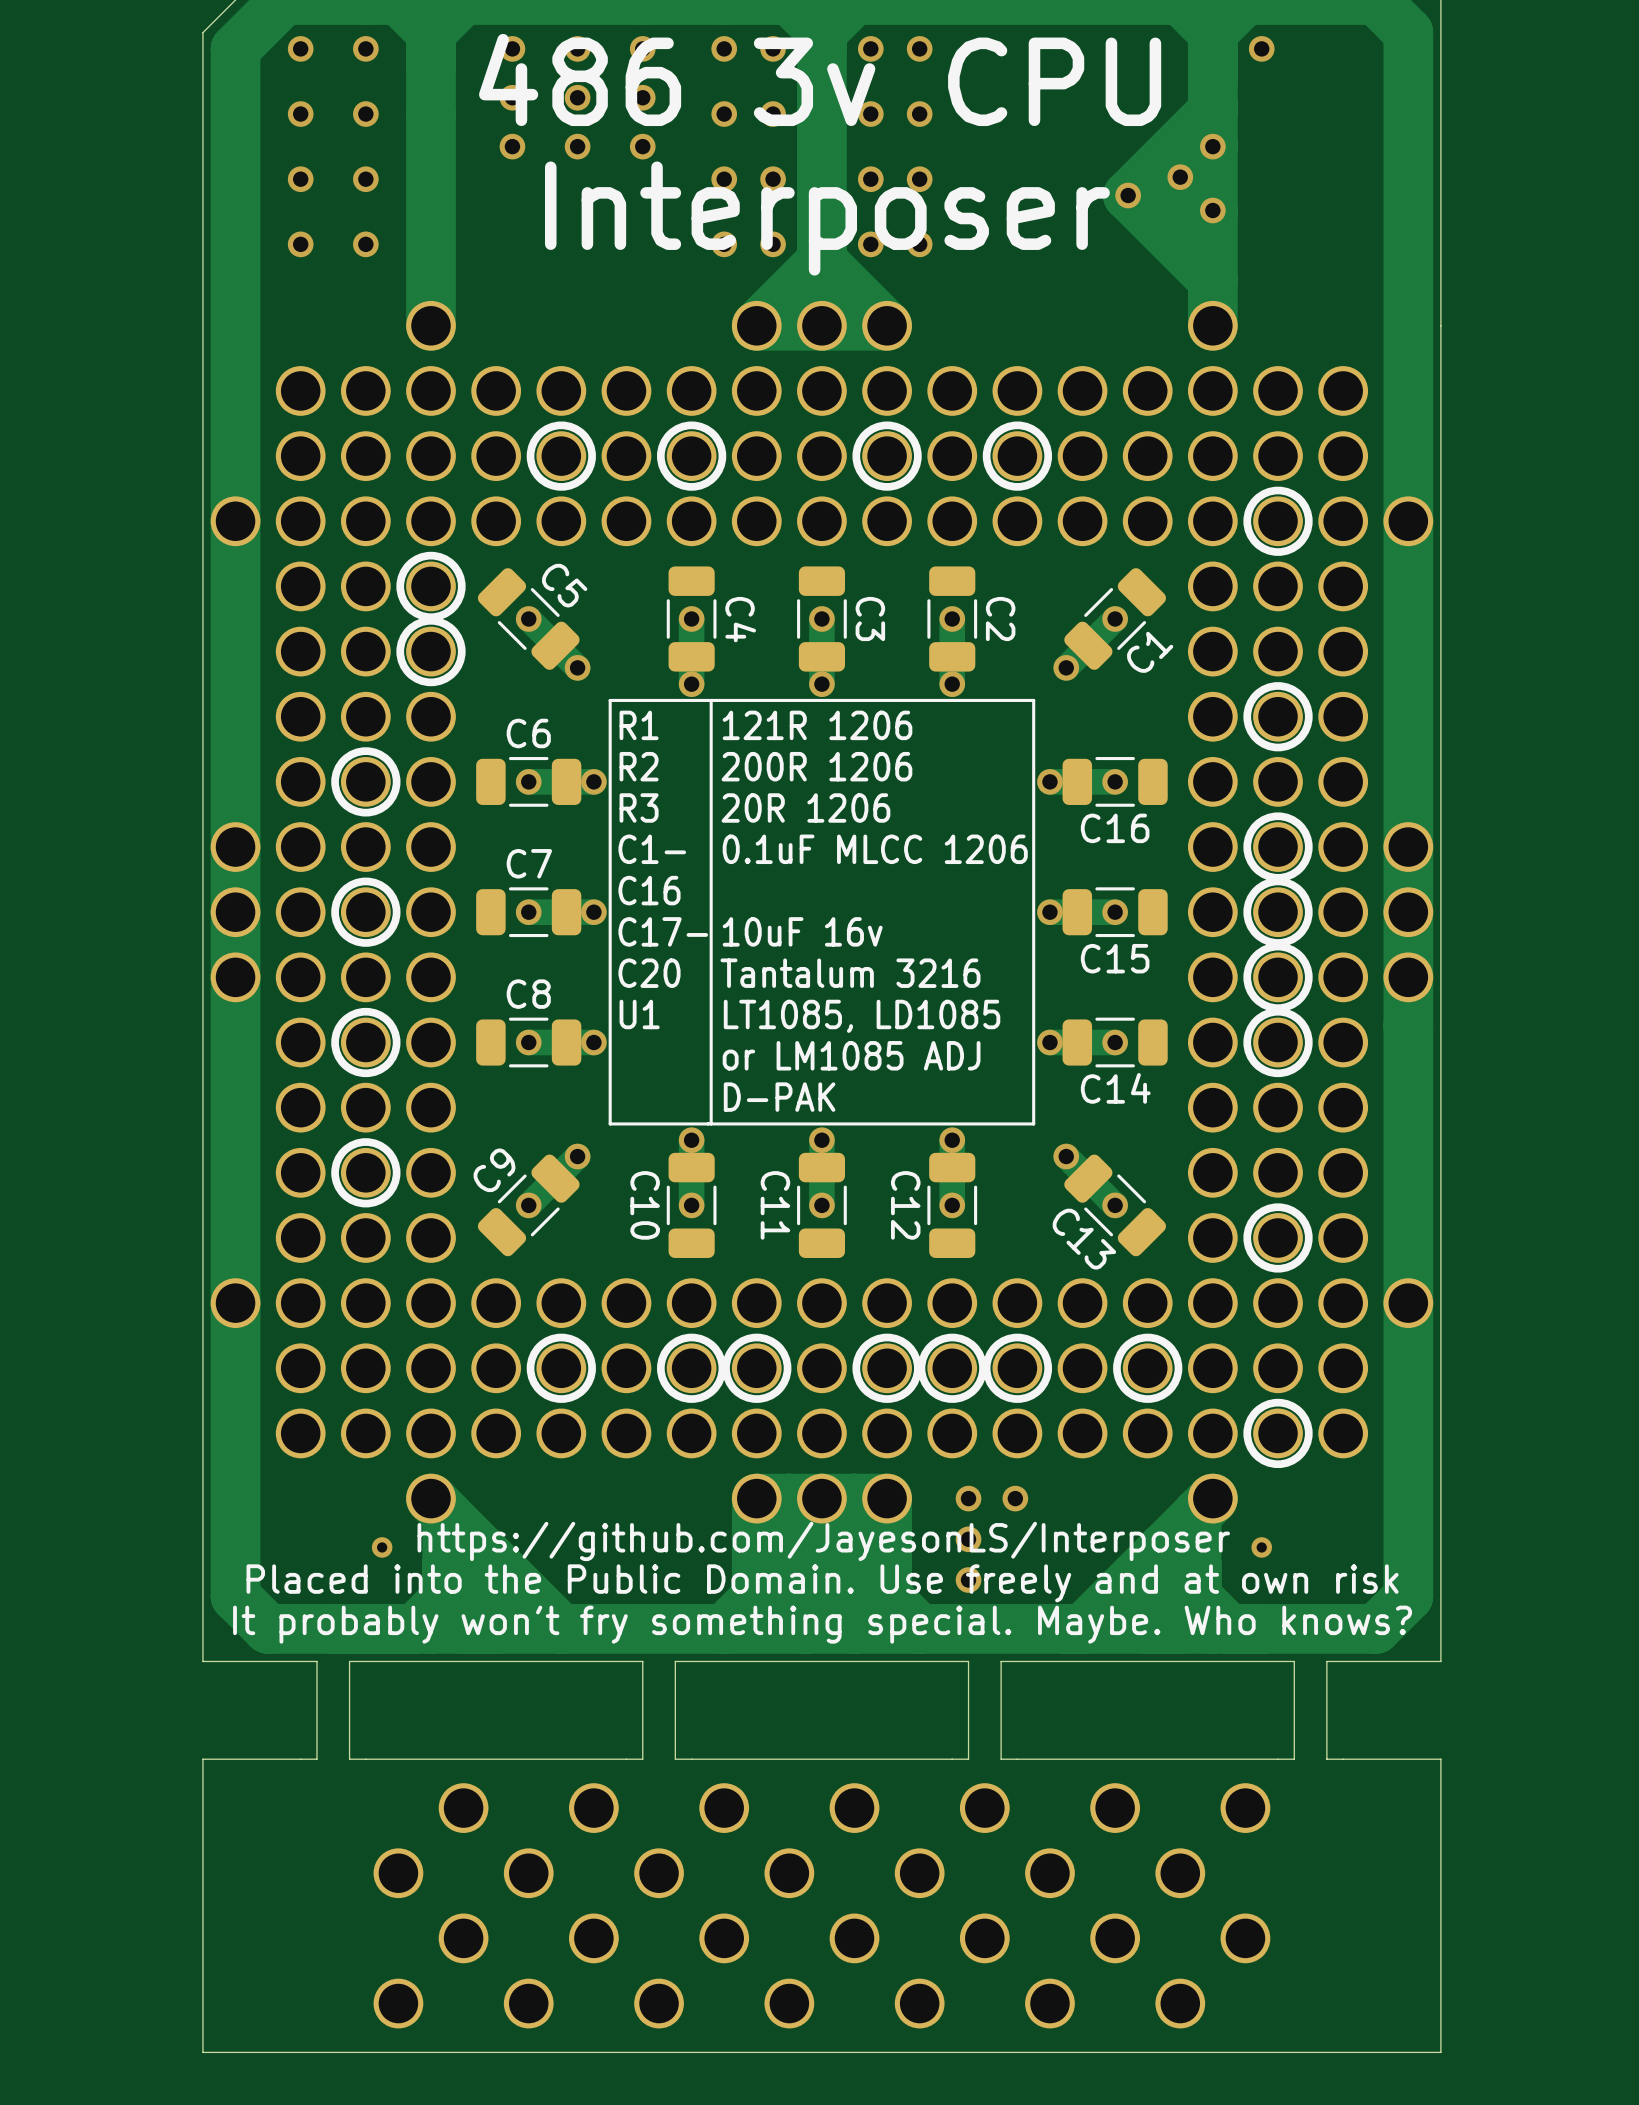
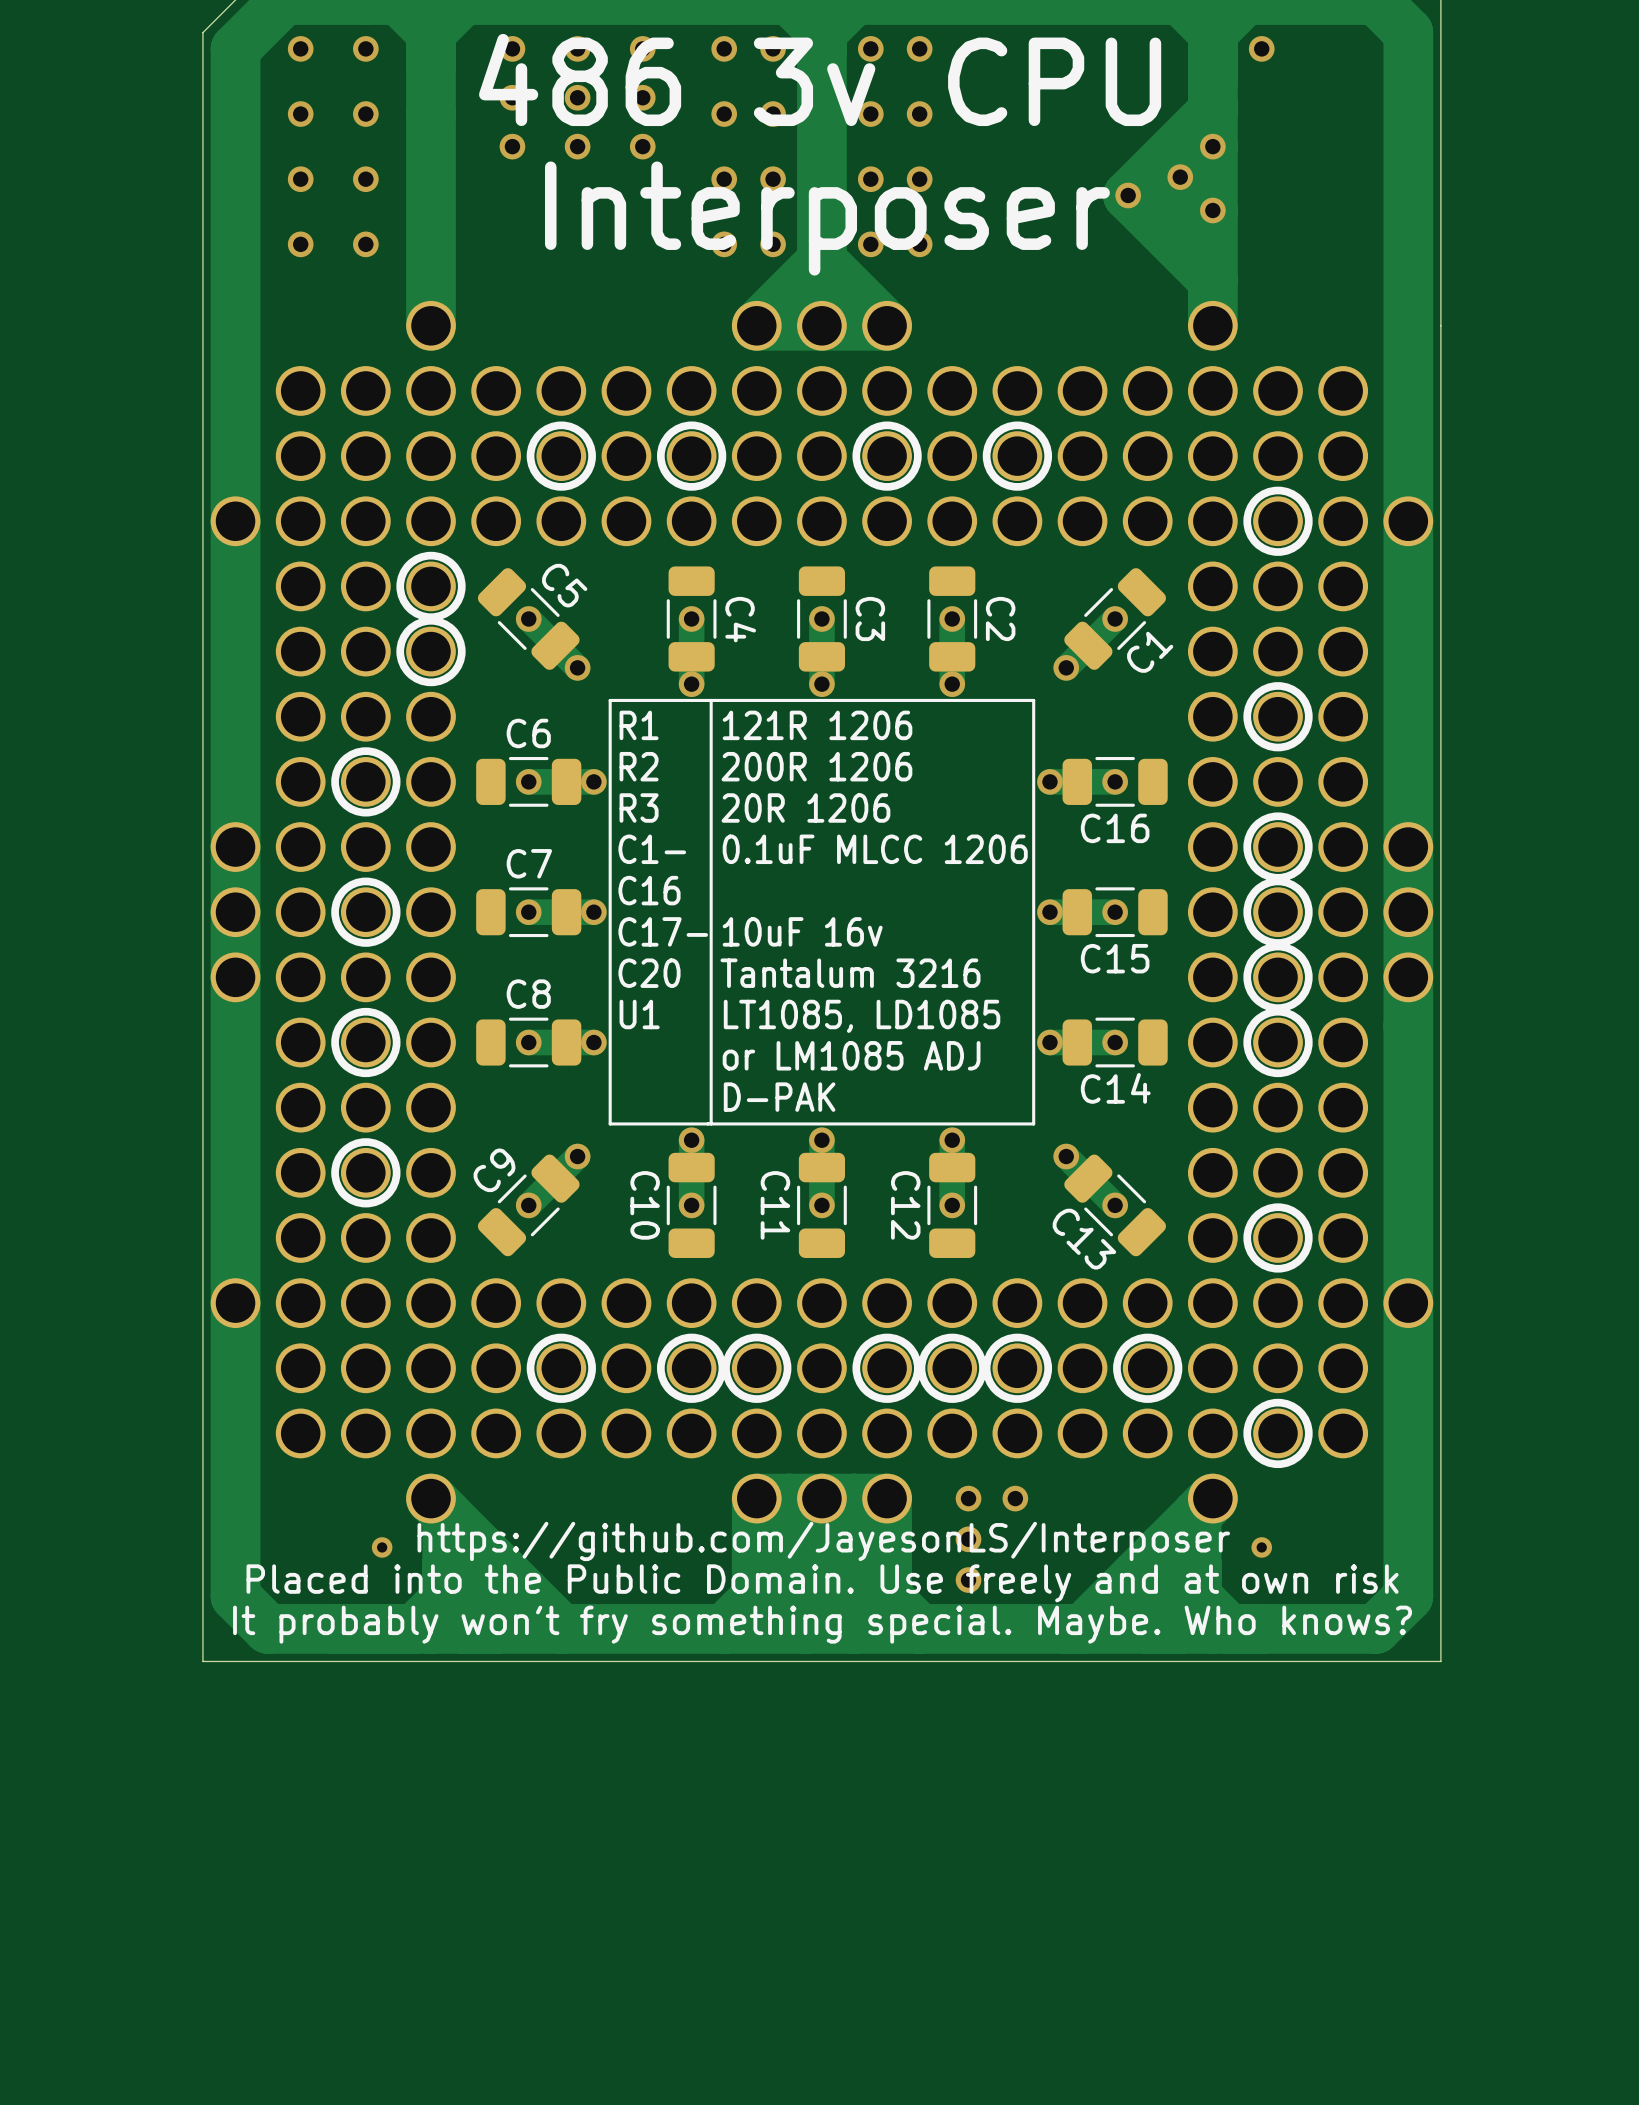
board edge: (642, 1661) (642, 1759) (349, 1759) (349, 1661) -> (316, 1661) (349, 1661)
board edge: (968, 1661) (968, 1759) (675, 1759) (675, 1661) -> (642, 1661) (675, 1661)
board edge: (1294, 1661) (1294, 1759) (1001, 1759) (1001, 1661) -> (968, 1661) (1001, 1661)
board edge: (1326, 1661) (1326, 1759) (1440, 1759) (1440, 2052) (202, 2052) (202, 1759) (316, 1759) (316, 1661) -> (1326, 1661) (1294, 1661)
part: (463, 1808) -> none
part: (593, 1808) -> none
part: (724, 1808) -> none
part: (854, 1808) -> none
part: (984, 1808) -> none
part: (1115, 1808) -> none
part: (1245, 1808) -> none
part: (398, 1873) -> none
part: (528, 1873) -> none
part: (659, 1873) -> none
part: (789, 1873) -> none
part: (919, 1873) -> none
part: (1049, 1873) -> none
part: (1180, 1873) -> none
part: (463, 1938) -> none
part: (593, 1938) -> none
part: (724, 1938) -> none
part: (854, 1938) -> none
part: (984, 1938) -> none
part: (1115, 1938) -> none
part: (1245, 1938) -> none
part: (398, 2003) -> none
part: (528, 2003) -> none
part: (659, 2003) -> none
part: (789, 2003) -> none
part: (919, 2003) -> none
part: (1049, 2003) -> none
part: (1180, 2003) -> none

